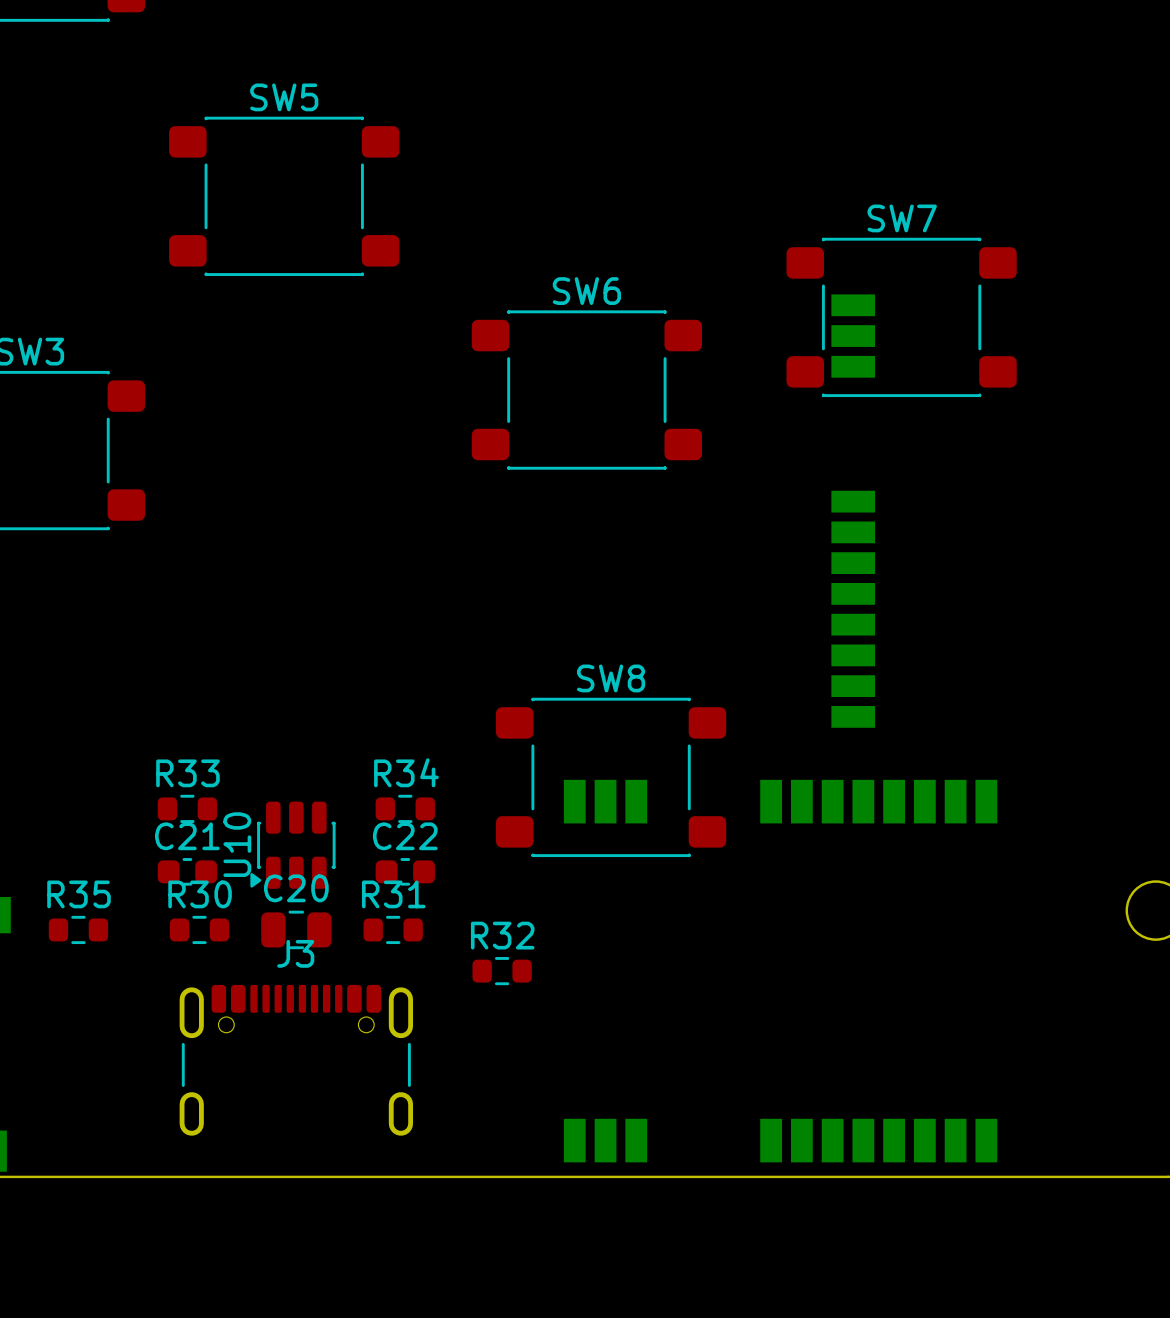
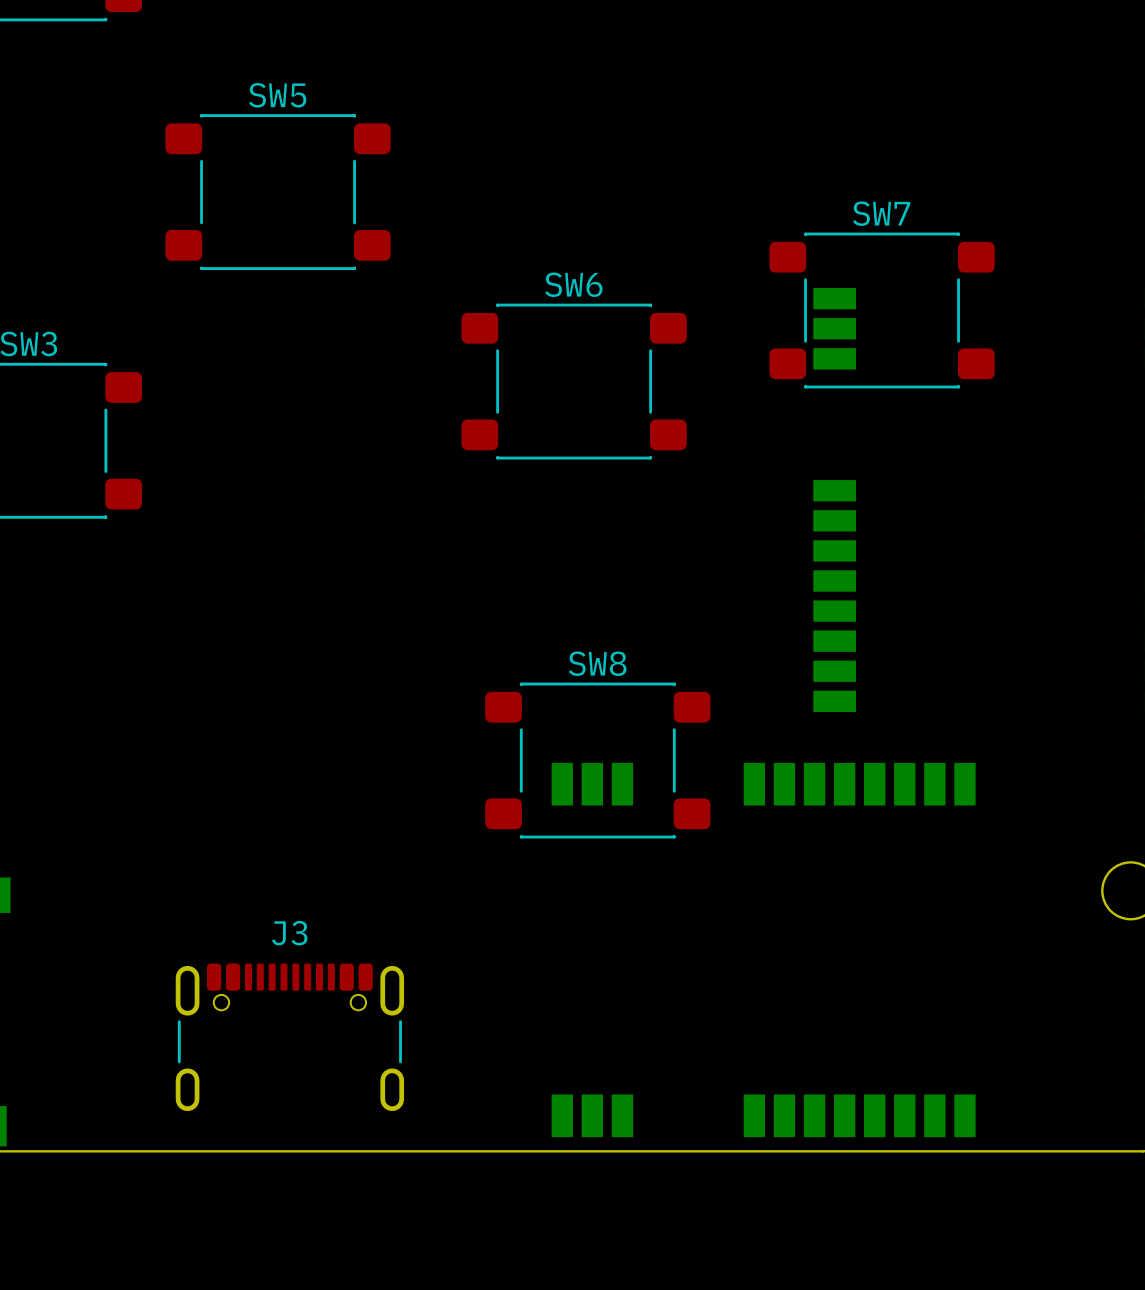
R33: (187, 808) -> none
R34: (405, 808) -> none
U10: (292, 845) -> none
C21: (187, 871) -> none
C22: (405, 871) -> none
R35: (78, 929) -> none
R30: (199, 929) -> none
C20: (296, 929) -> none
R31: (393, 929) -> none
R32: (502, 971) -> none

